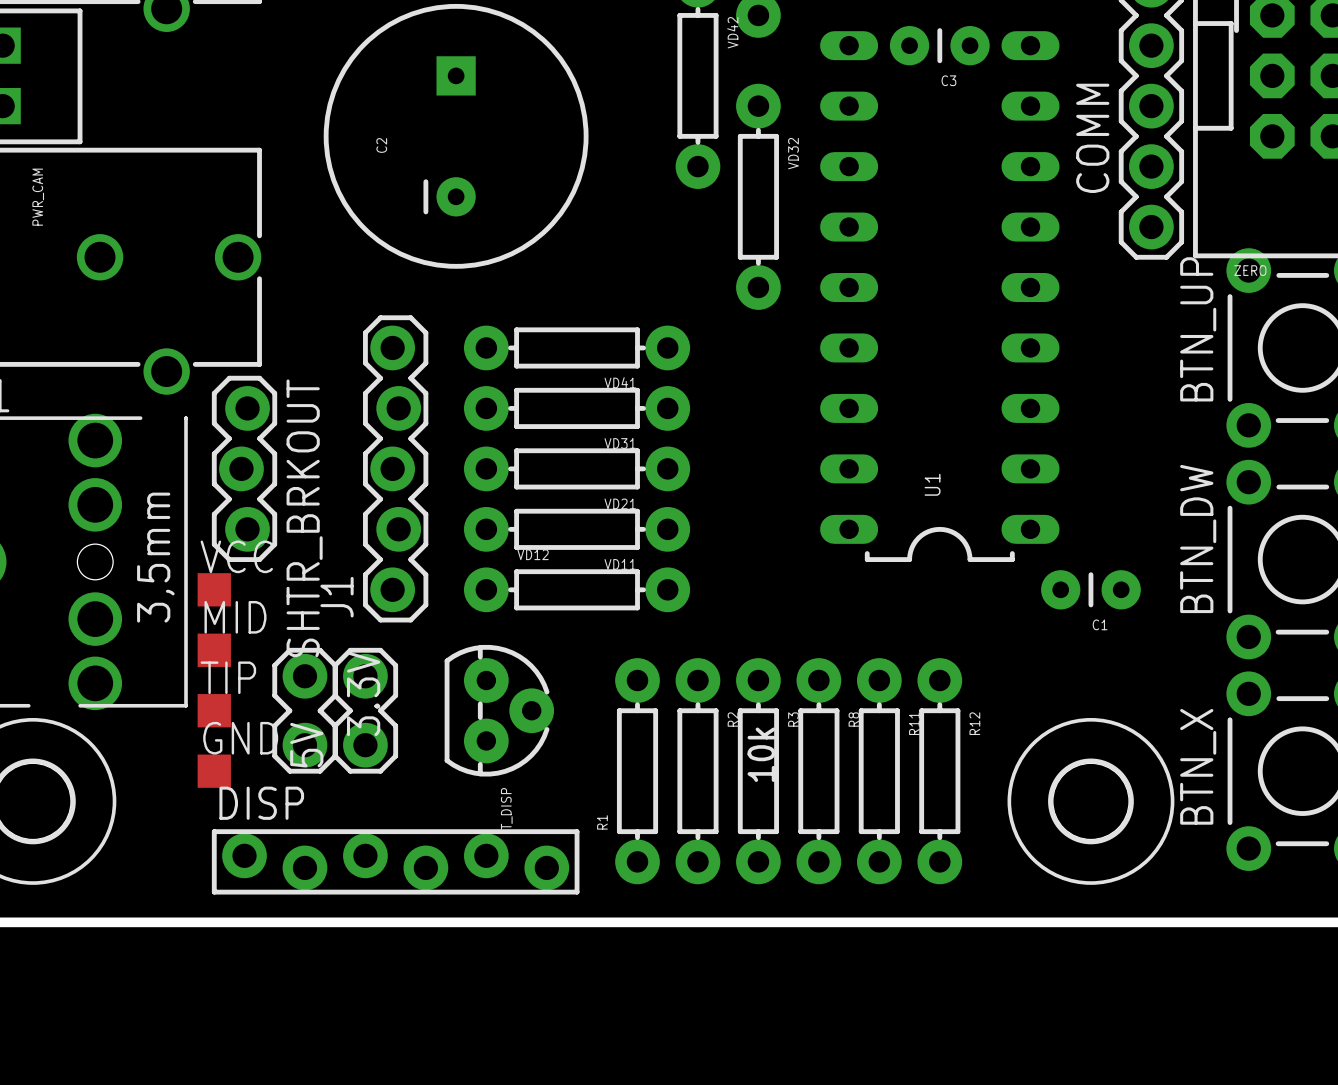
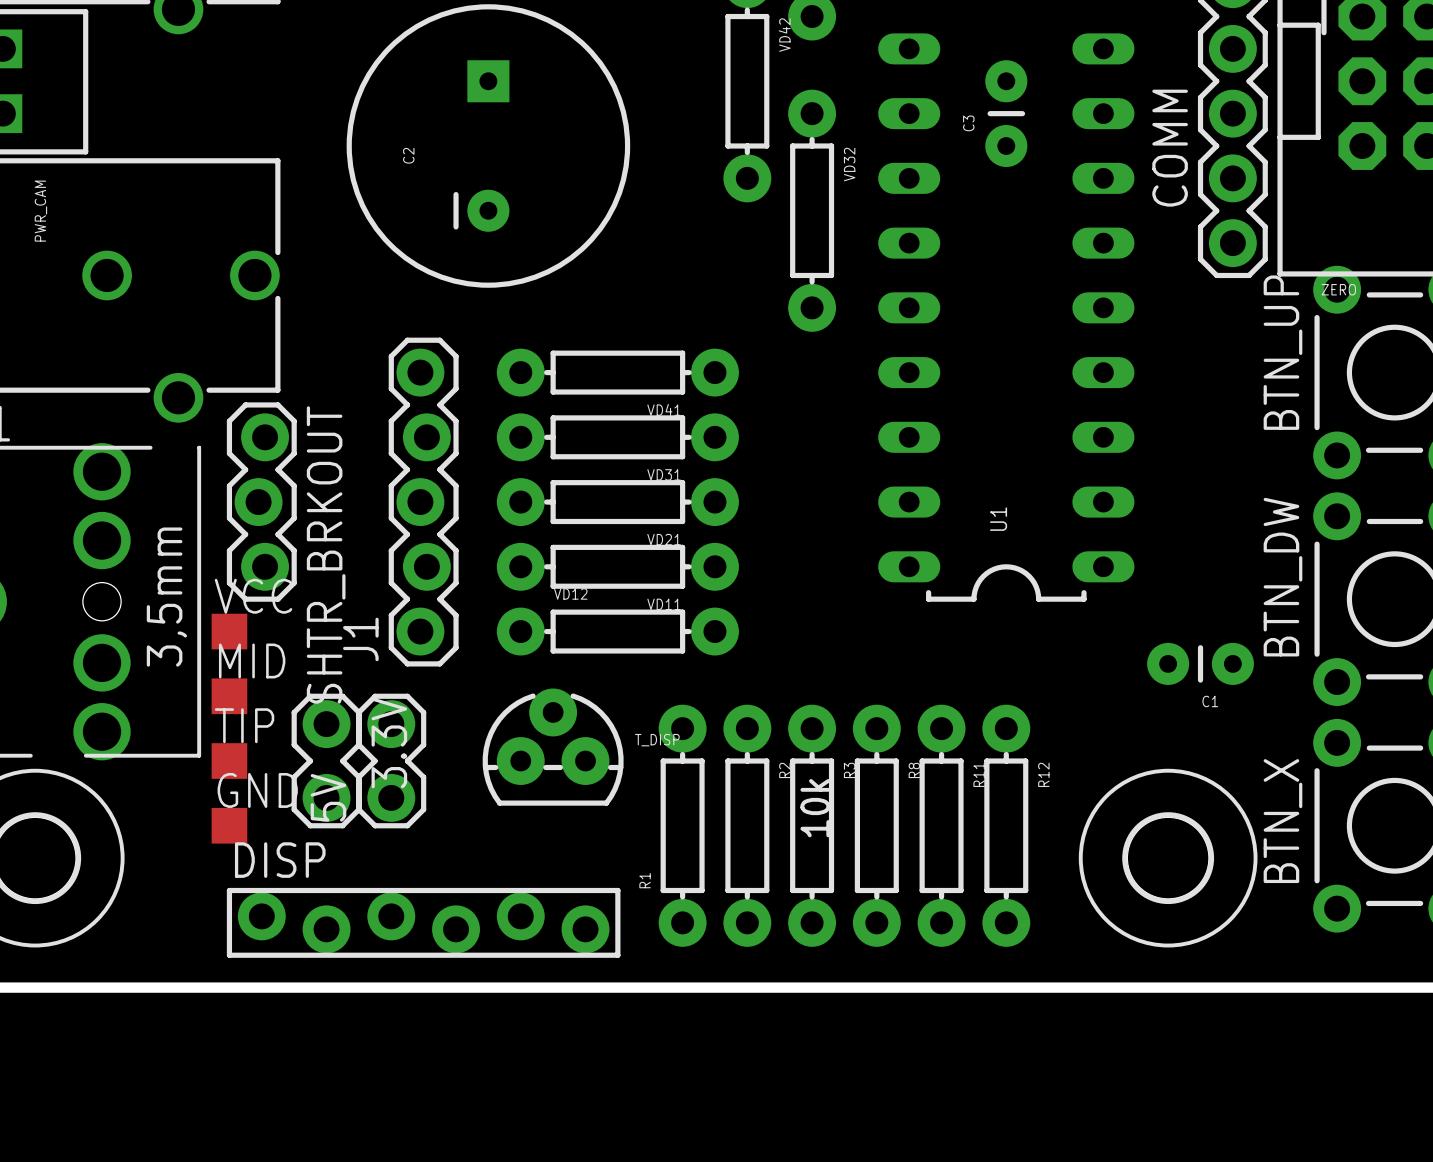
C3 rotation: 0° (939, 45) -> 90° clockwise (1006, 113)
C3 position: (939, 45) -> (1006, 113)
C1 position: (1090, 589) -> (1200, 663)
T_DISP rotation: 0° (499, 710) -> 90° counterclockwise (553, 747)

